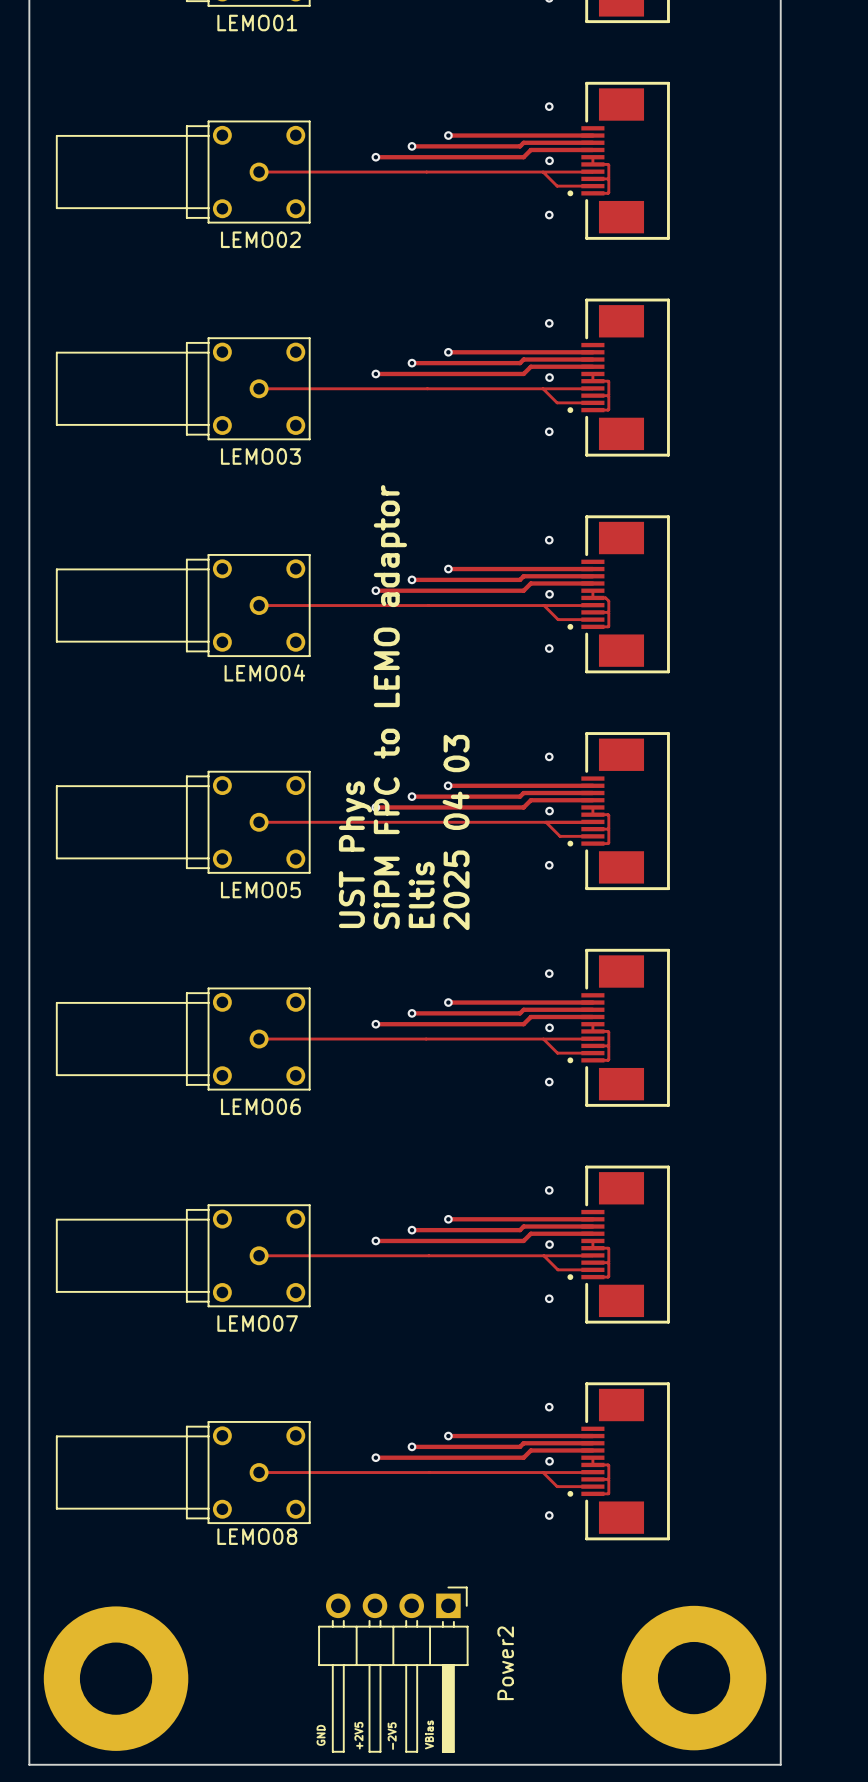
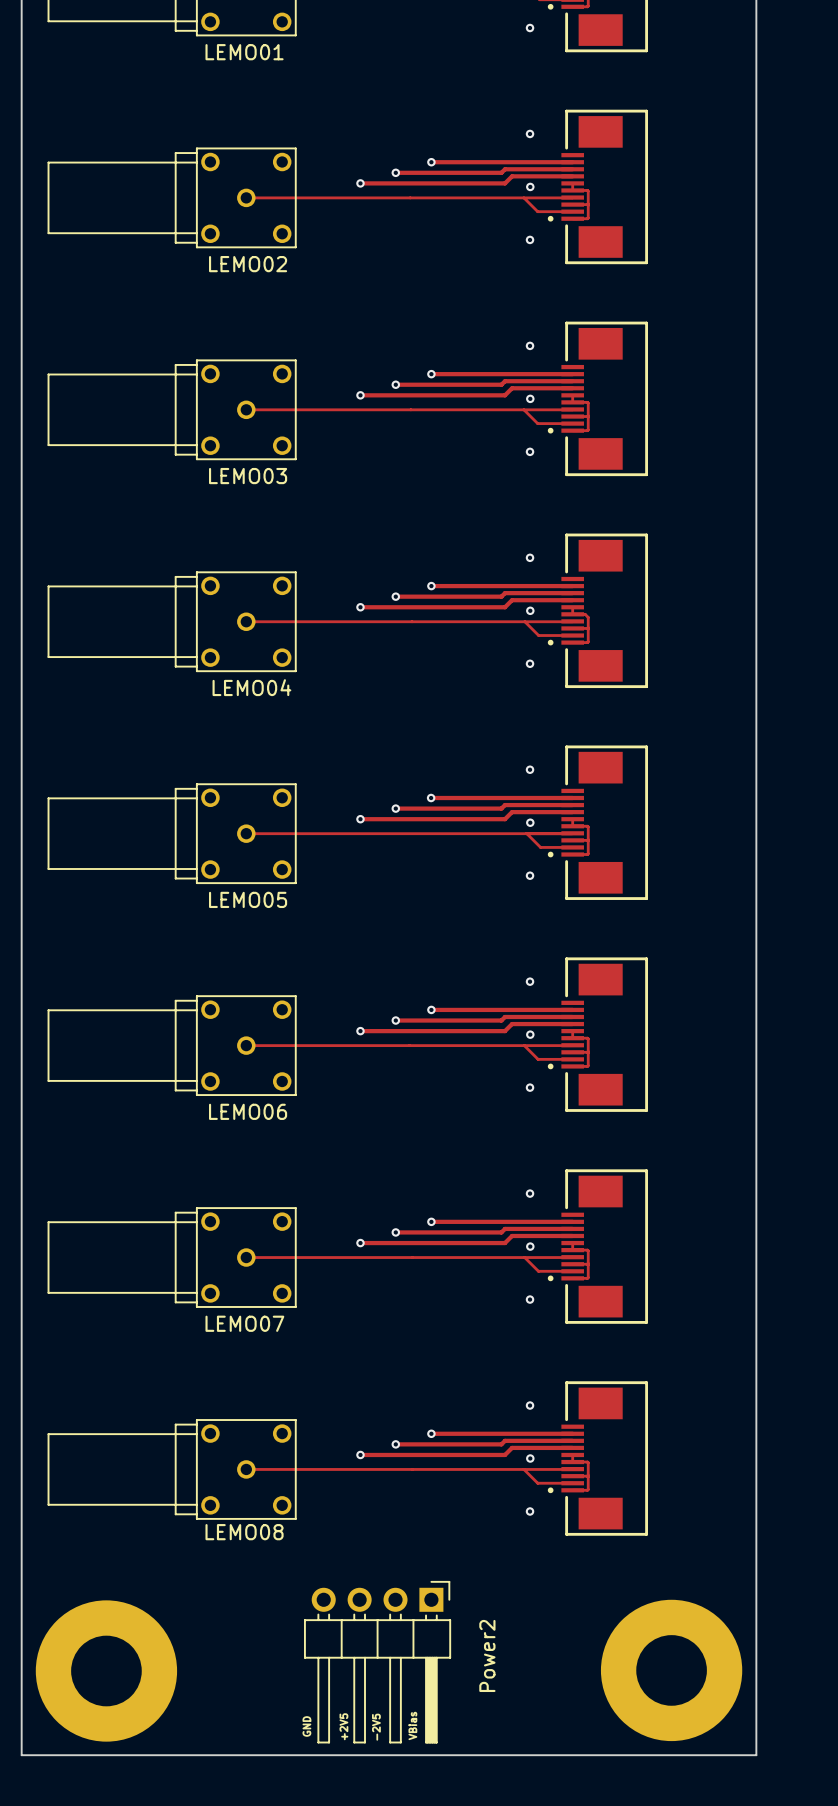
text: SiPM FPC to LEMO adaptor (390, 707) -> none
text: 2025 04 03 (456, 832) -> none
text: UST Phys (355, 854) -> none
text: Eltis (421, 894) -> none

